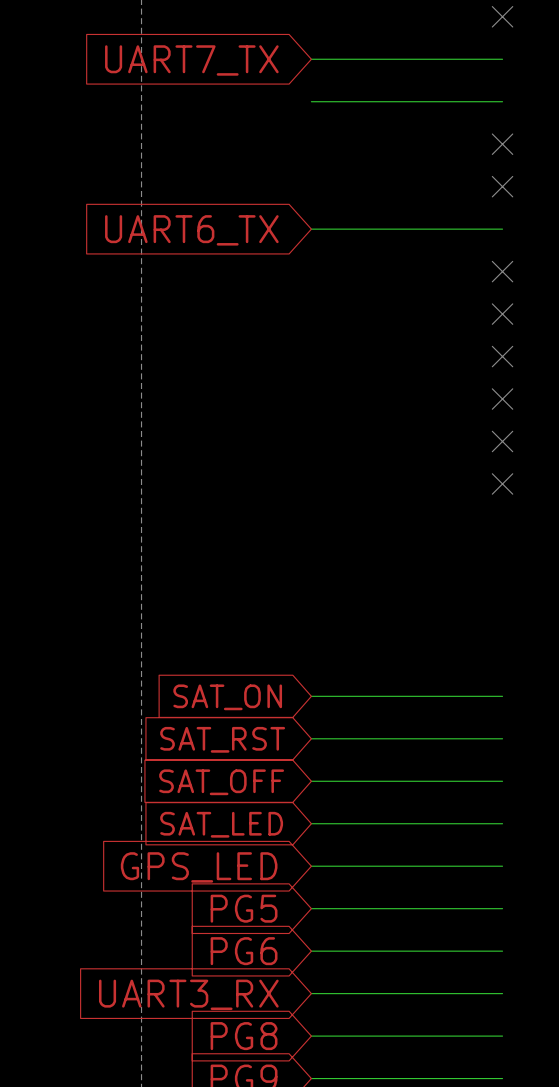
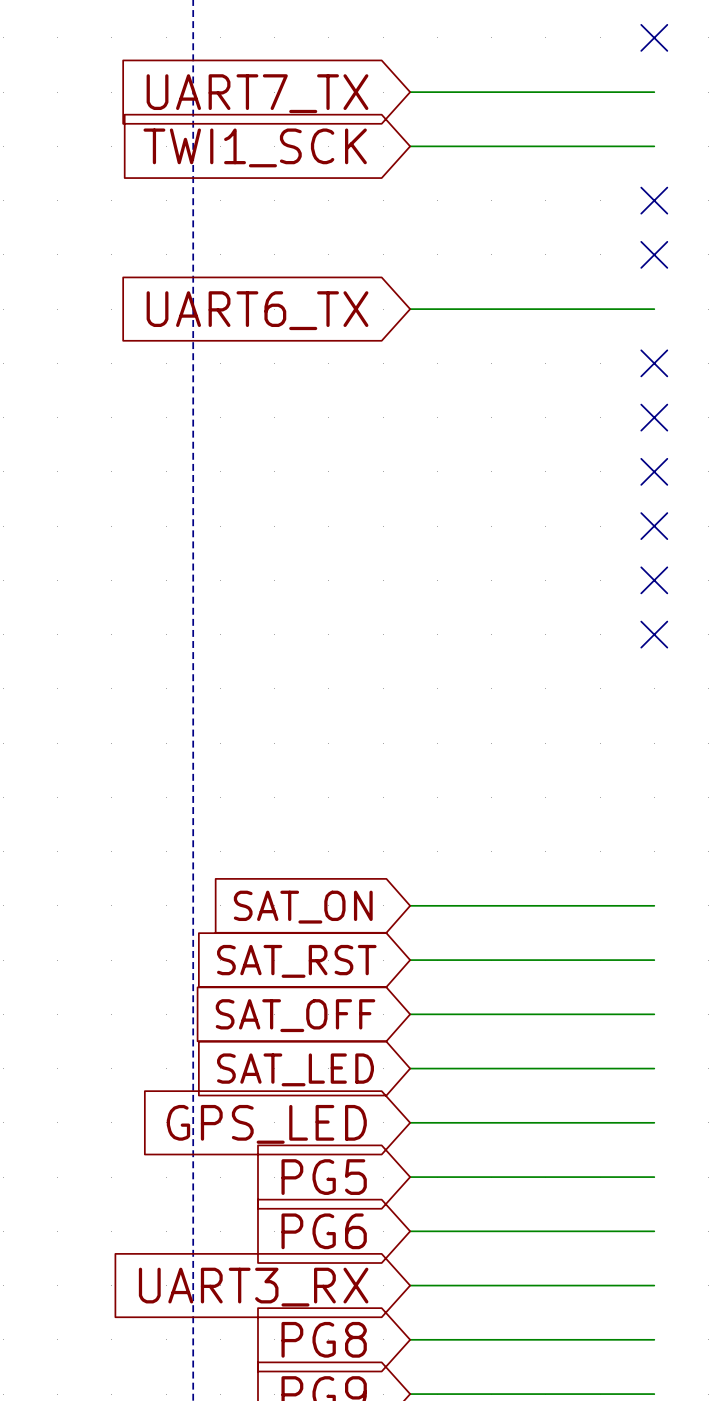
global label: none -> TWI1_SCK (255, 147)

